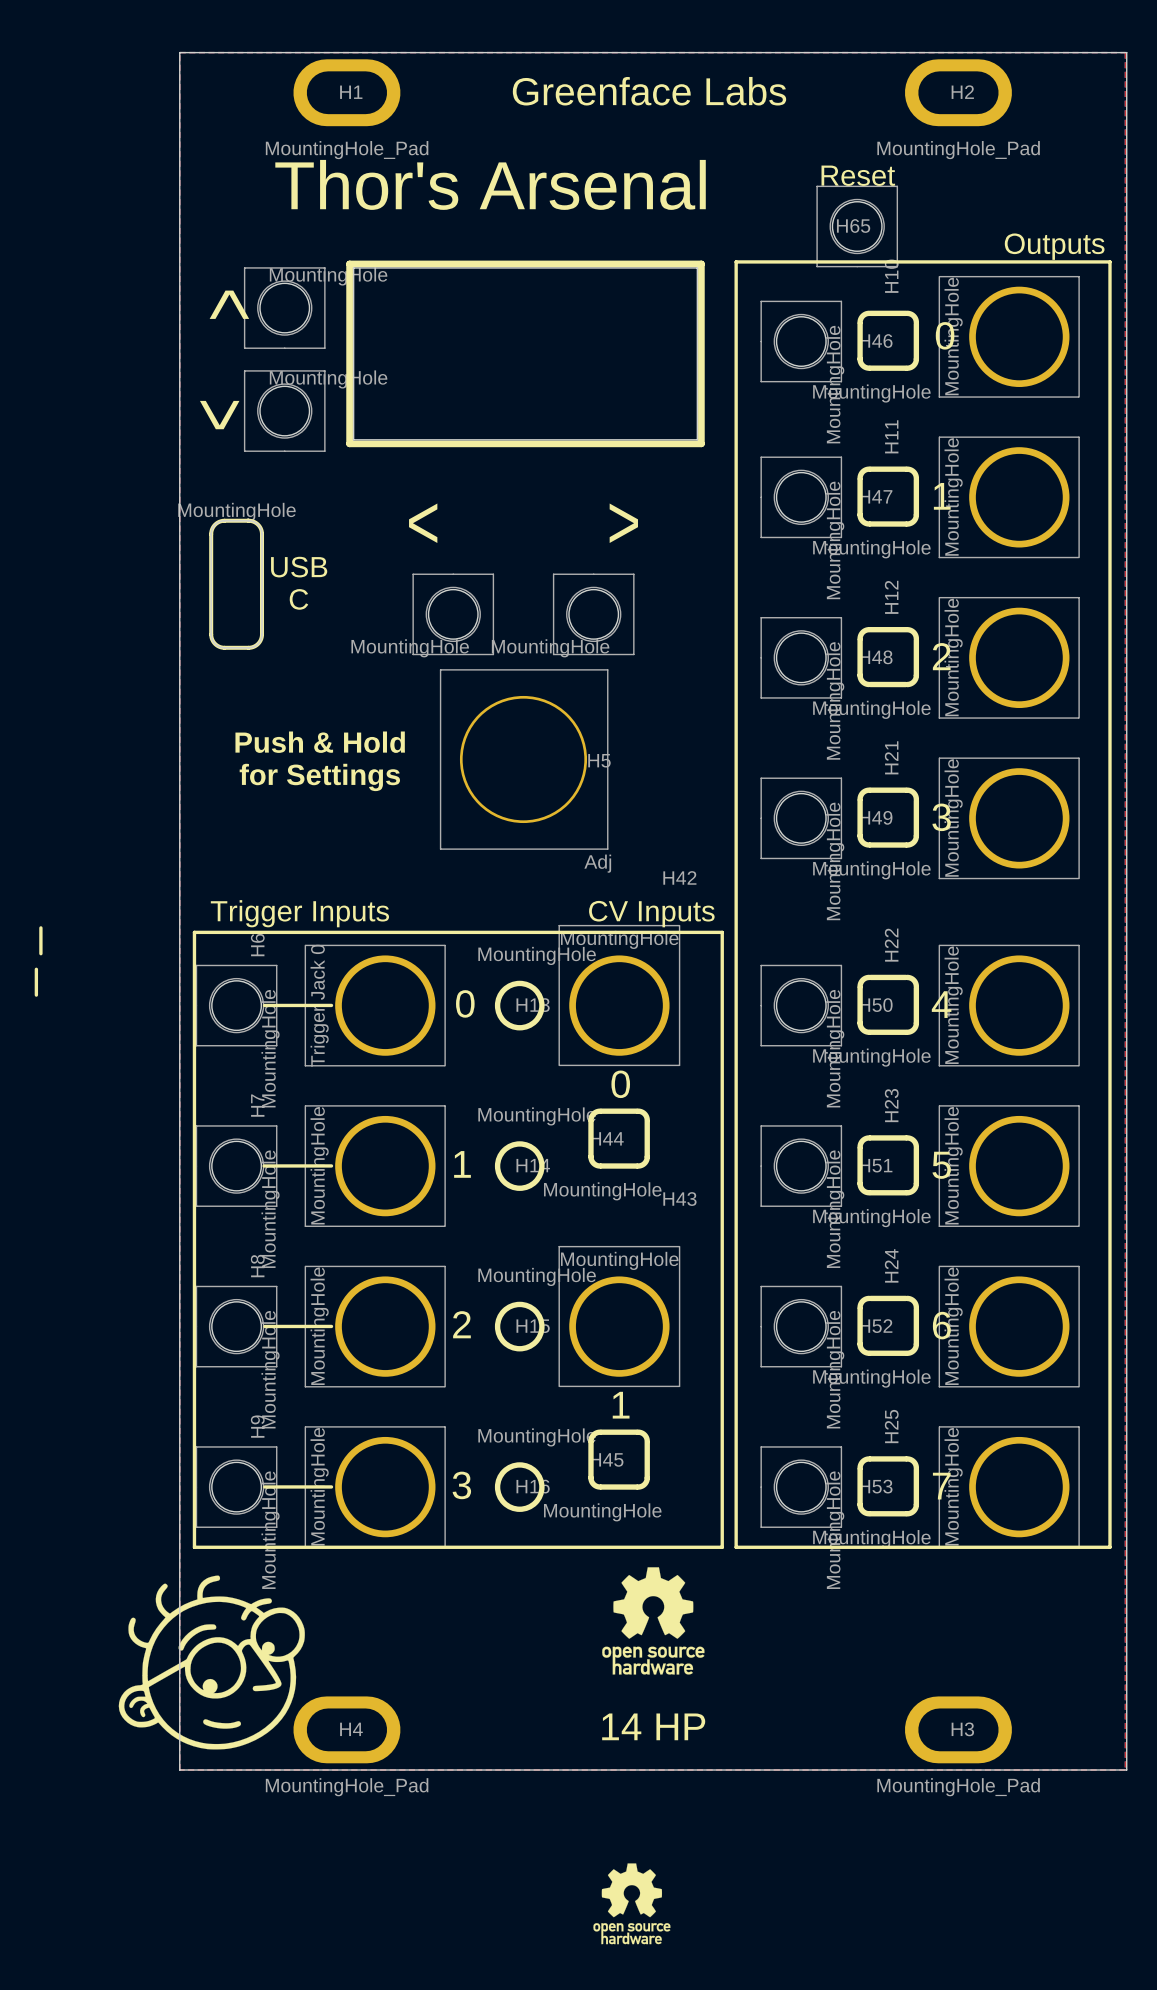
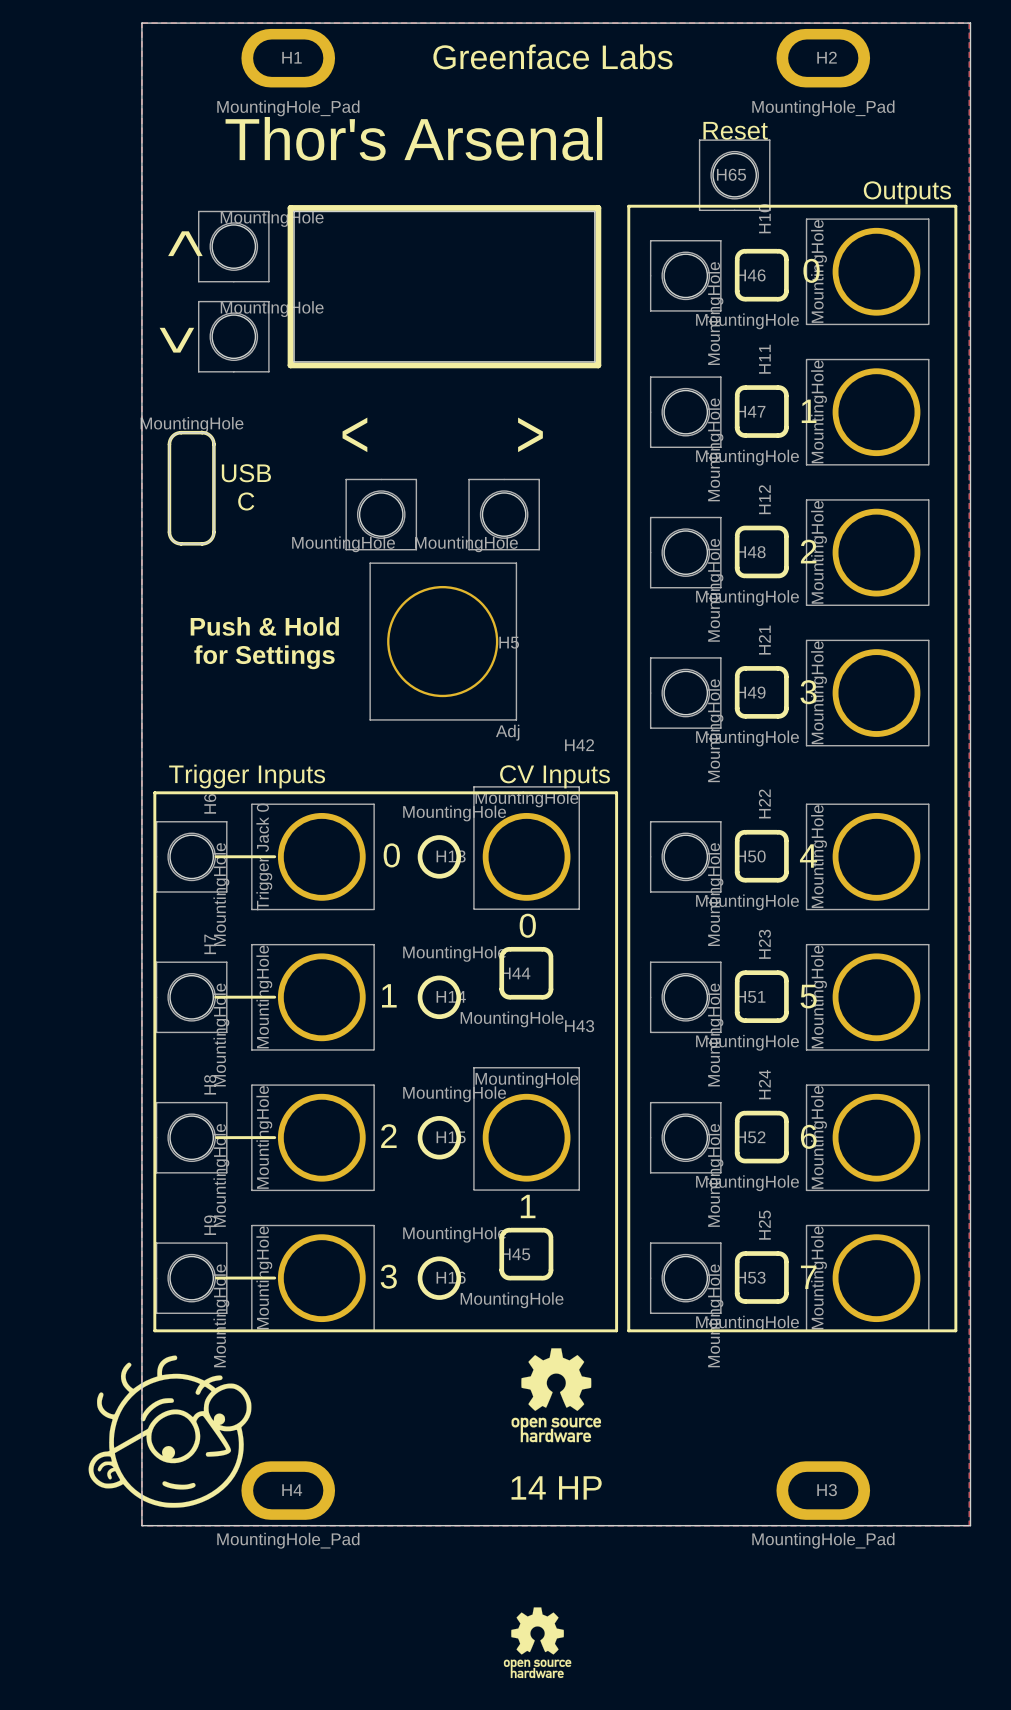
line: (40, 927) (40, 953) -> none
line: (36, 969) (36, 995) -> none

